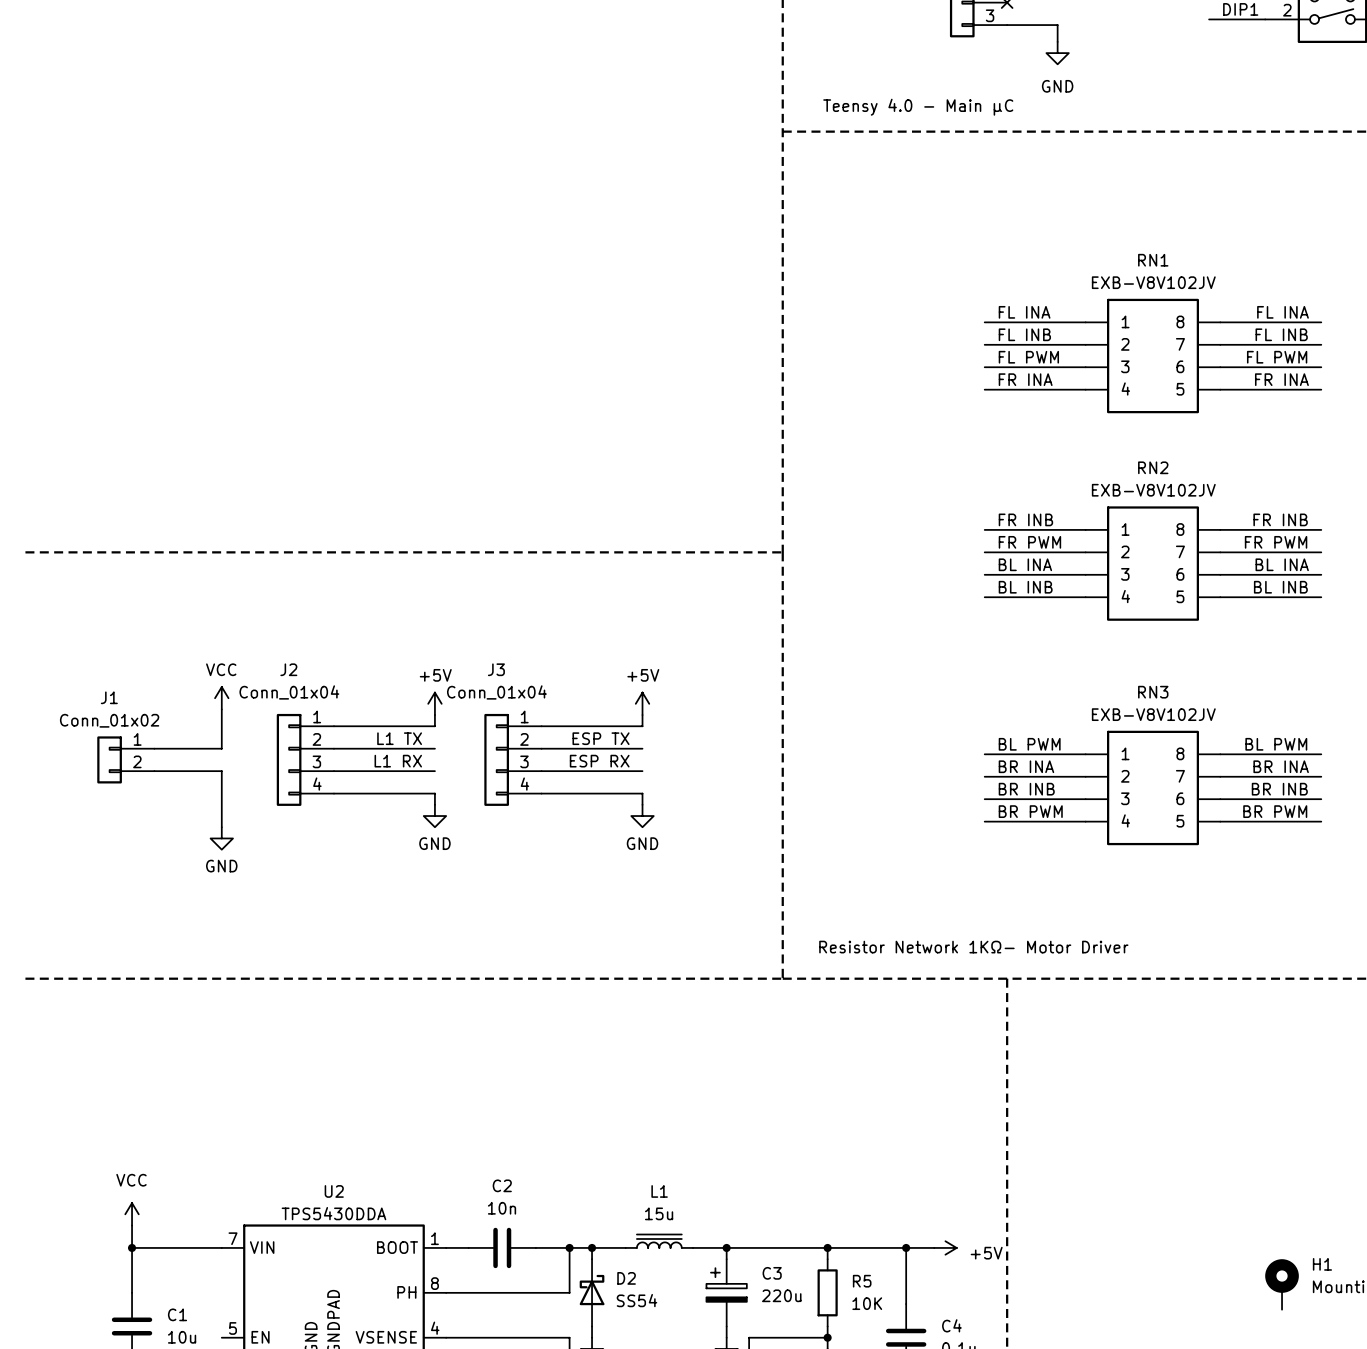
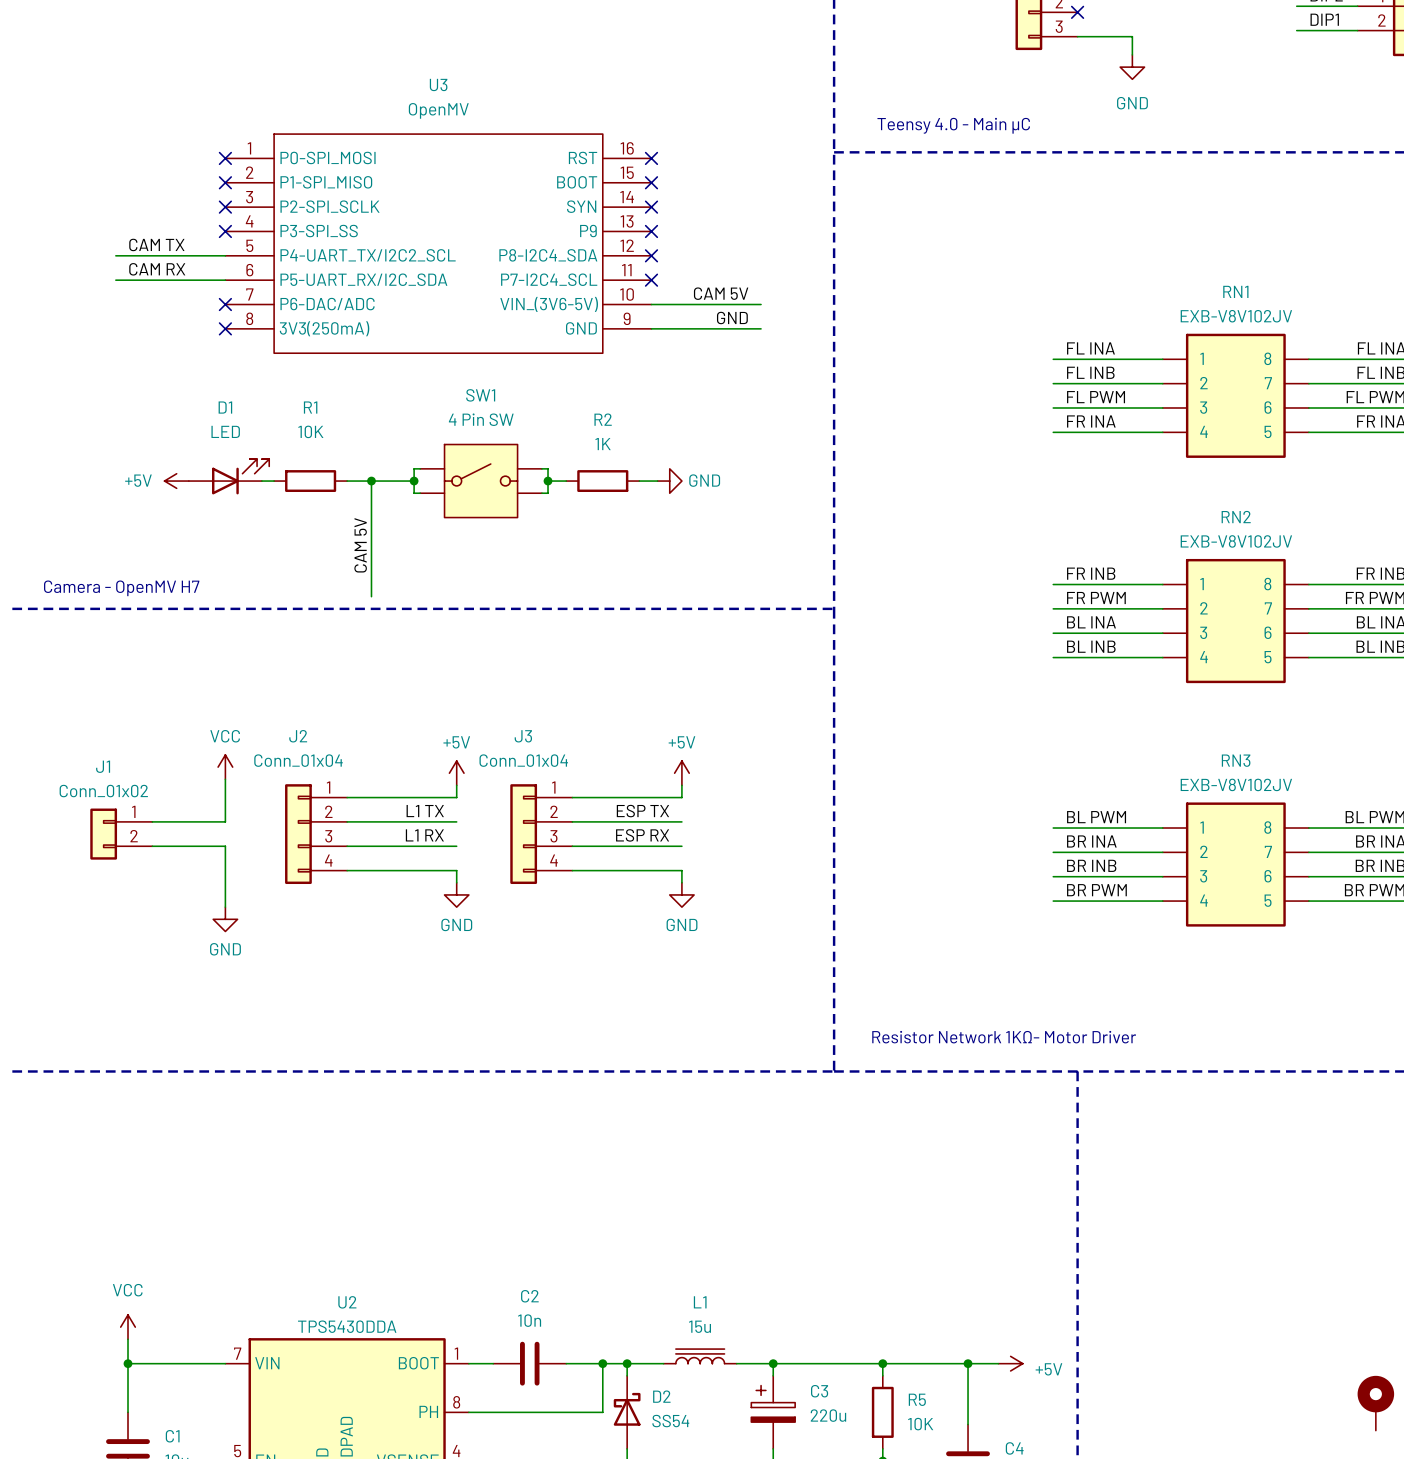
no-connect mark: none -> (225, 158)
no-connect mark: none -> (651, 158)
no-connect mark: none -> (225, 182)
no-connect mark: none -> (651, 182)
no-connect mark: none -> (225, 207)
no-connect mark: none -> (651, 207)
no-connect mark: none -> (225, 231)
no-connect mark: none -> (651, 231)
U3: none -> OpenMV (438, 243)
label: none -> CAM TX (156, 244)
wire: none -> (115, 255) (225, 255)
no-connect mark: none -> (651, 255)
label: none -> CAM RX (157, 269)
wire: none -> (115, 280) (225, 280)
no-connect mark: none -> (651, 280)
label: none -> CAM 5V (721, 293)
no-connect mark: none -> (225, 304)
wire: none -> (651, 304) (761, 304)
label: none -> GND (732, 318)
no-connect mark: none -> (225, 328)
wire: none -> (651, 328) (761, 328)
wire: none -> (420, 468) (414, 468) (414, 493) (420, 493)
wire: none -> (541, 468) (548, 468) (548, 493) (541, 493)
D1: none -> LED (229, 476)
power symbol: none -> +5V (176, 481)
wire: none -> (261, 481) (274, 481)
R1: none -> 10K (310, 481)
wire: none -> (347, 481) (414, 481)
wire: none -> (371, 481) (371, 596)
junction: none -> (371, 481)
junction: none -> (414, 481)
SW1: none -> 4 Pin SW (481, 481)
wire: none -> (548, 481) (566, 481)
junction: none -> (548, 481)
R2: none -> 1K (602, 481)
wire: none -> (639, 481) (657, 481)
power symbol: none -> GND (669, 481)
label: none -> CAM 5V (360, 545)
text: none -> Camera - OpenMV H7 (121, 588)

